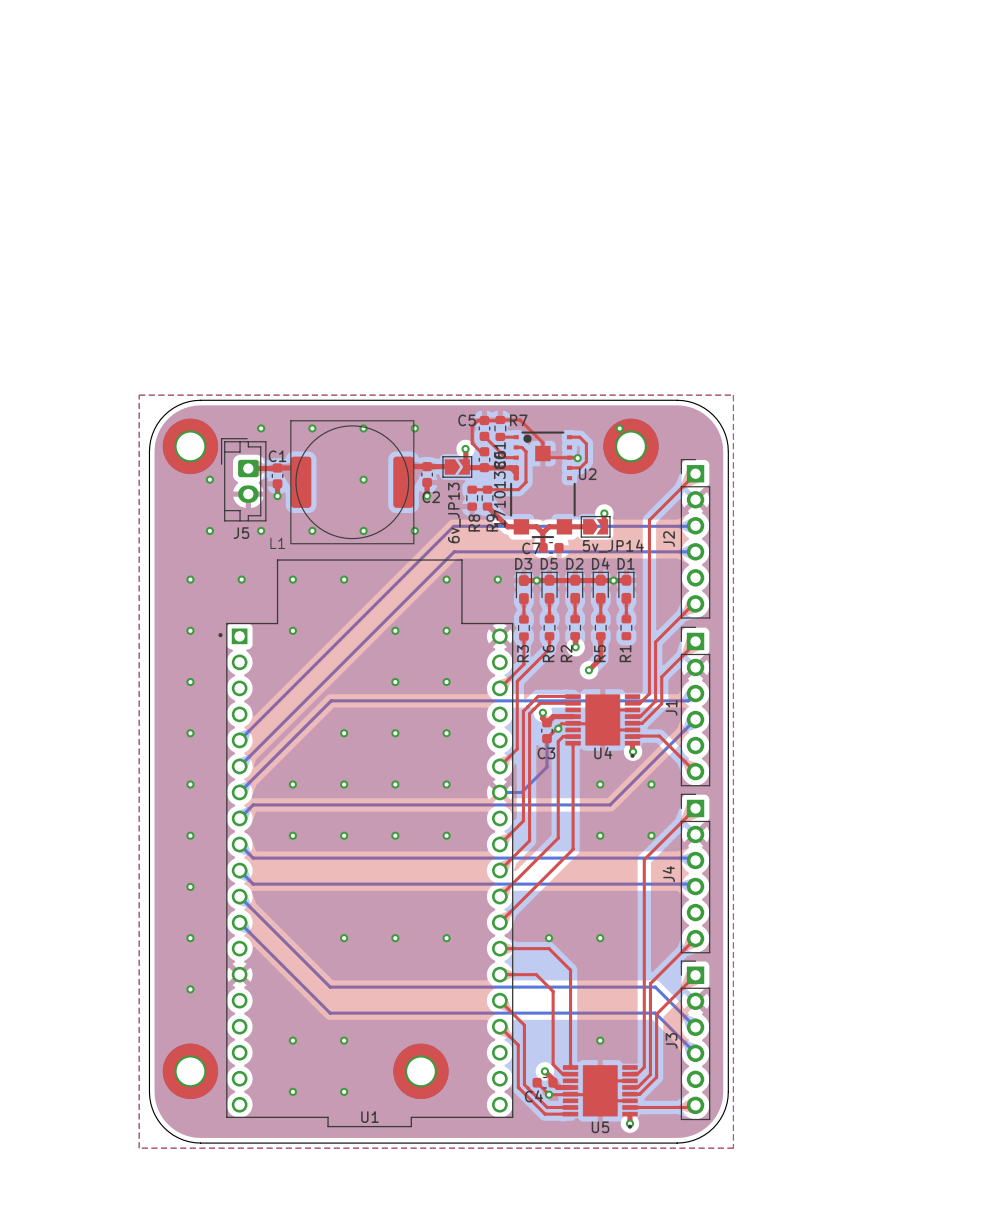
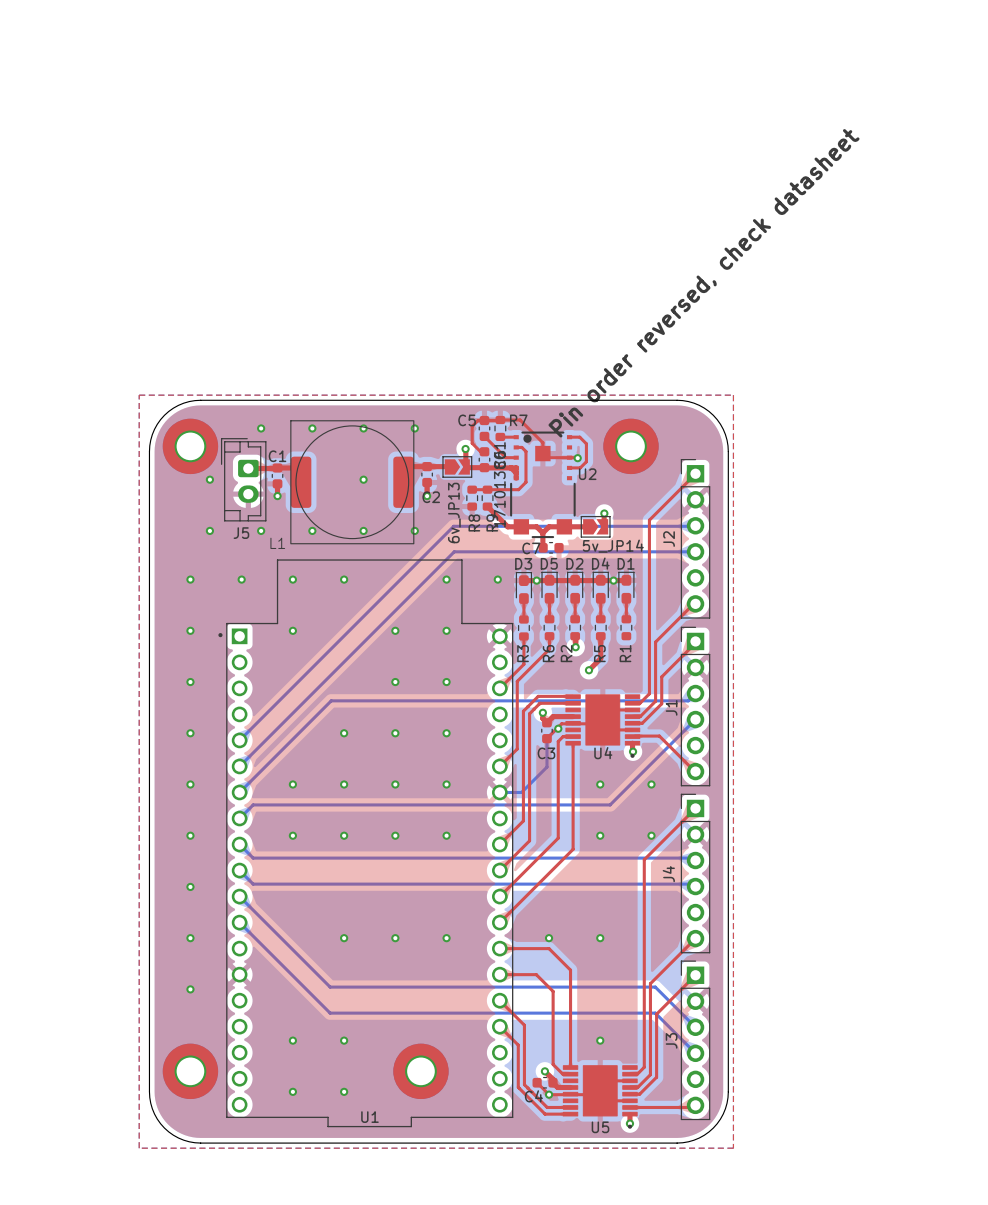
text: none -> Pin order reversed, check datasheet (704, 283)
via: (619, 428) -> none

